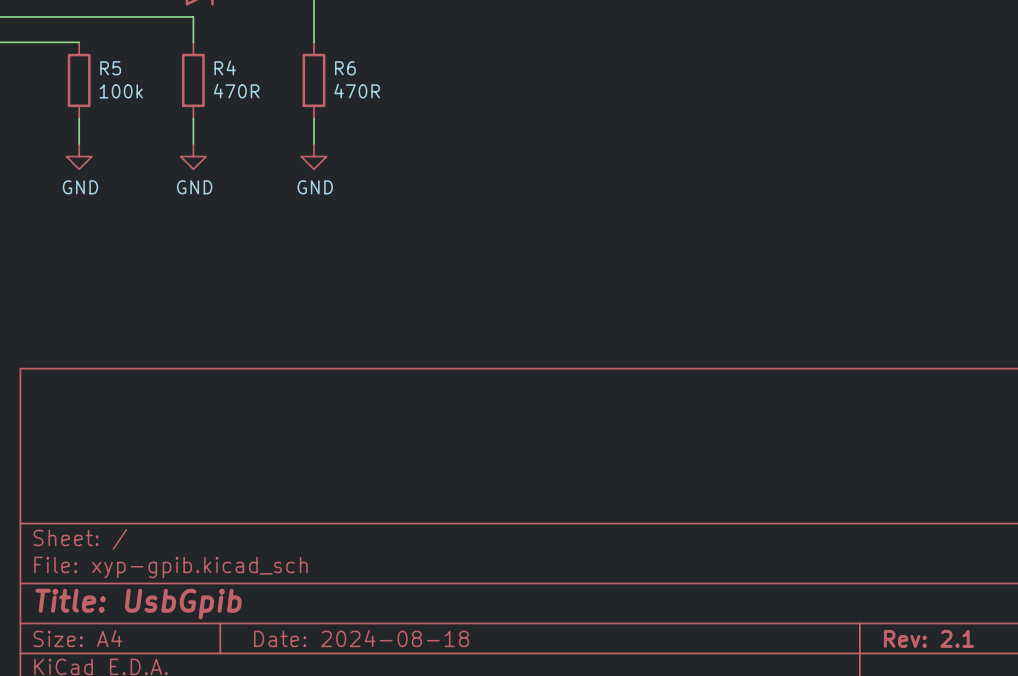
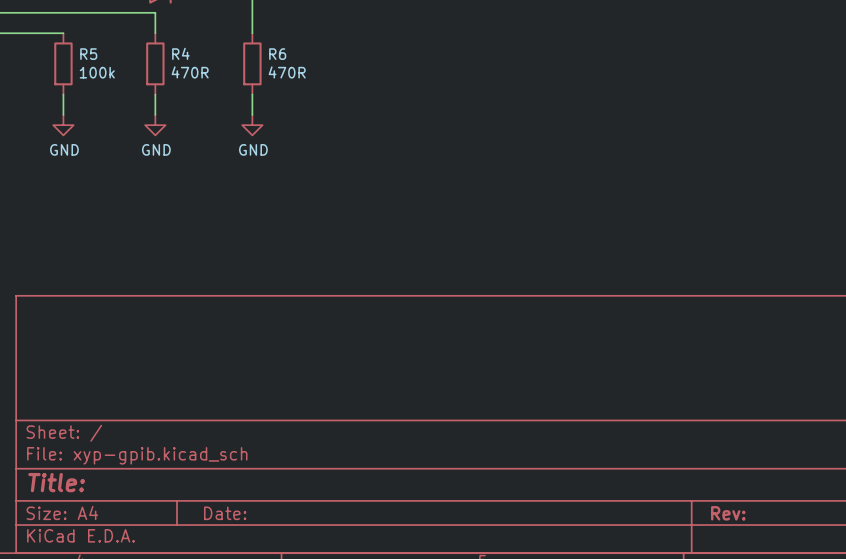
title block: Title: UsbGpib (138, 604) -> Title: (56, 482)
title block: Date: 2024-08-18 (361, 638) -> Date: (225, 513)
title block: Rev: 2.1 (928, 638) -> Rev: (728, 513)

